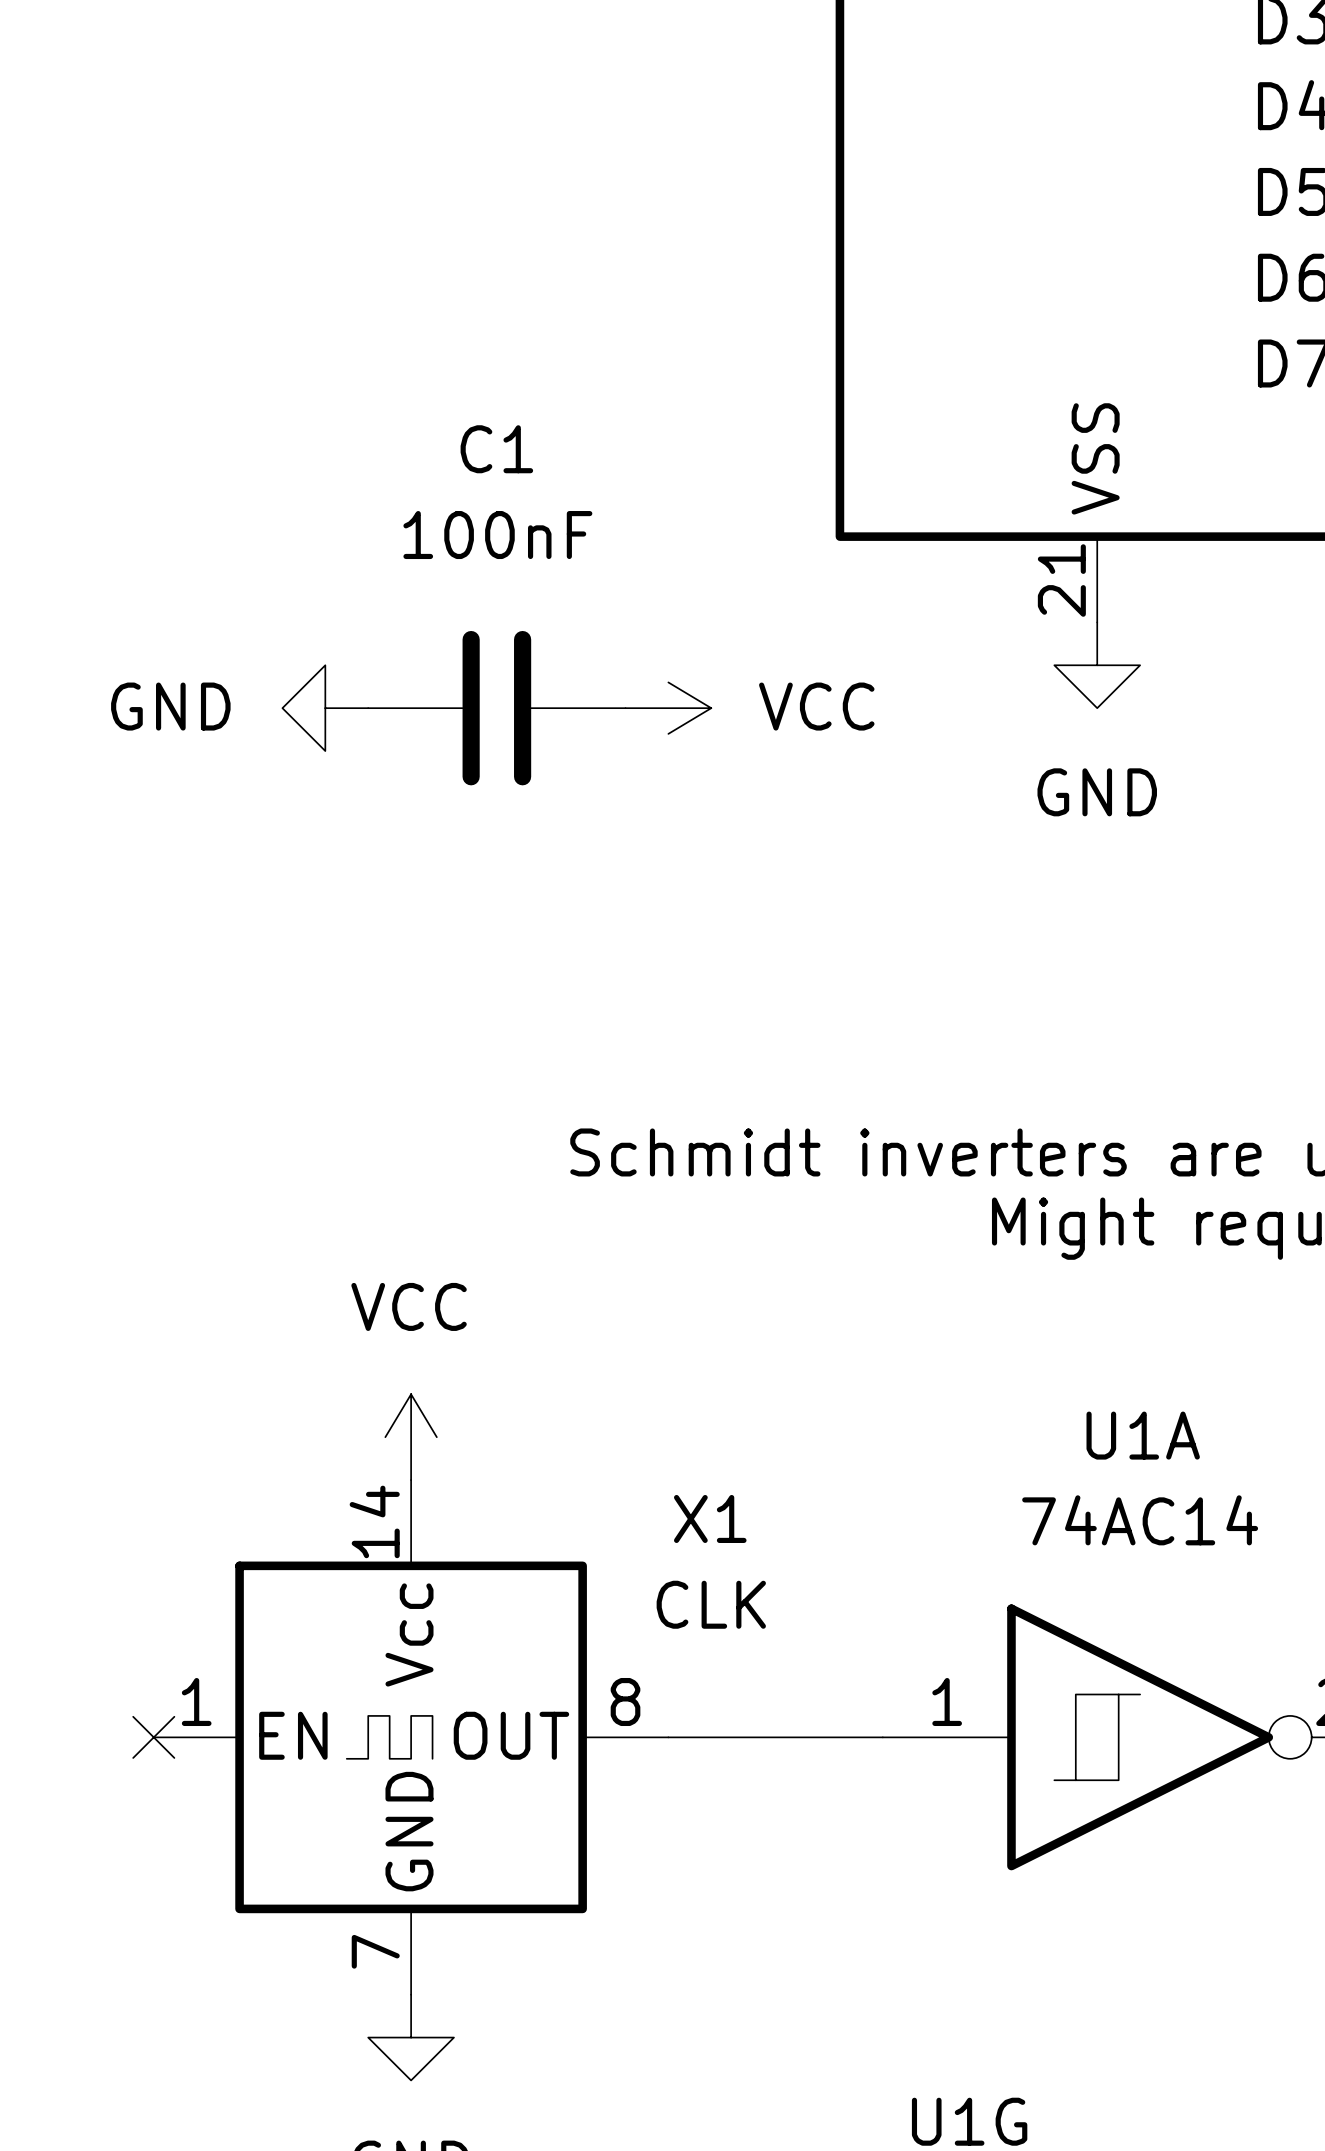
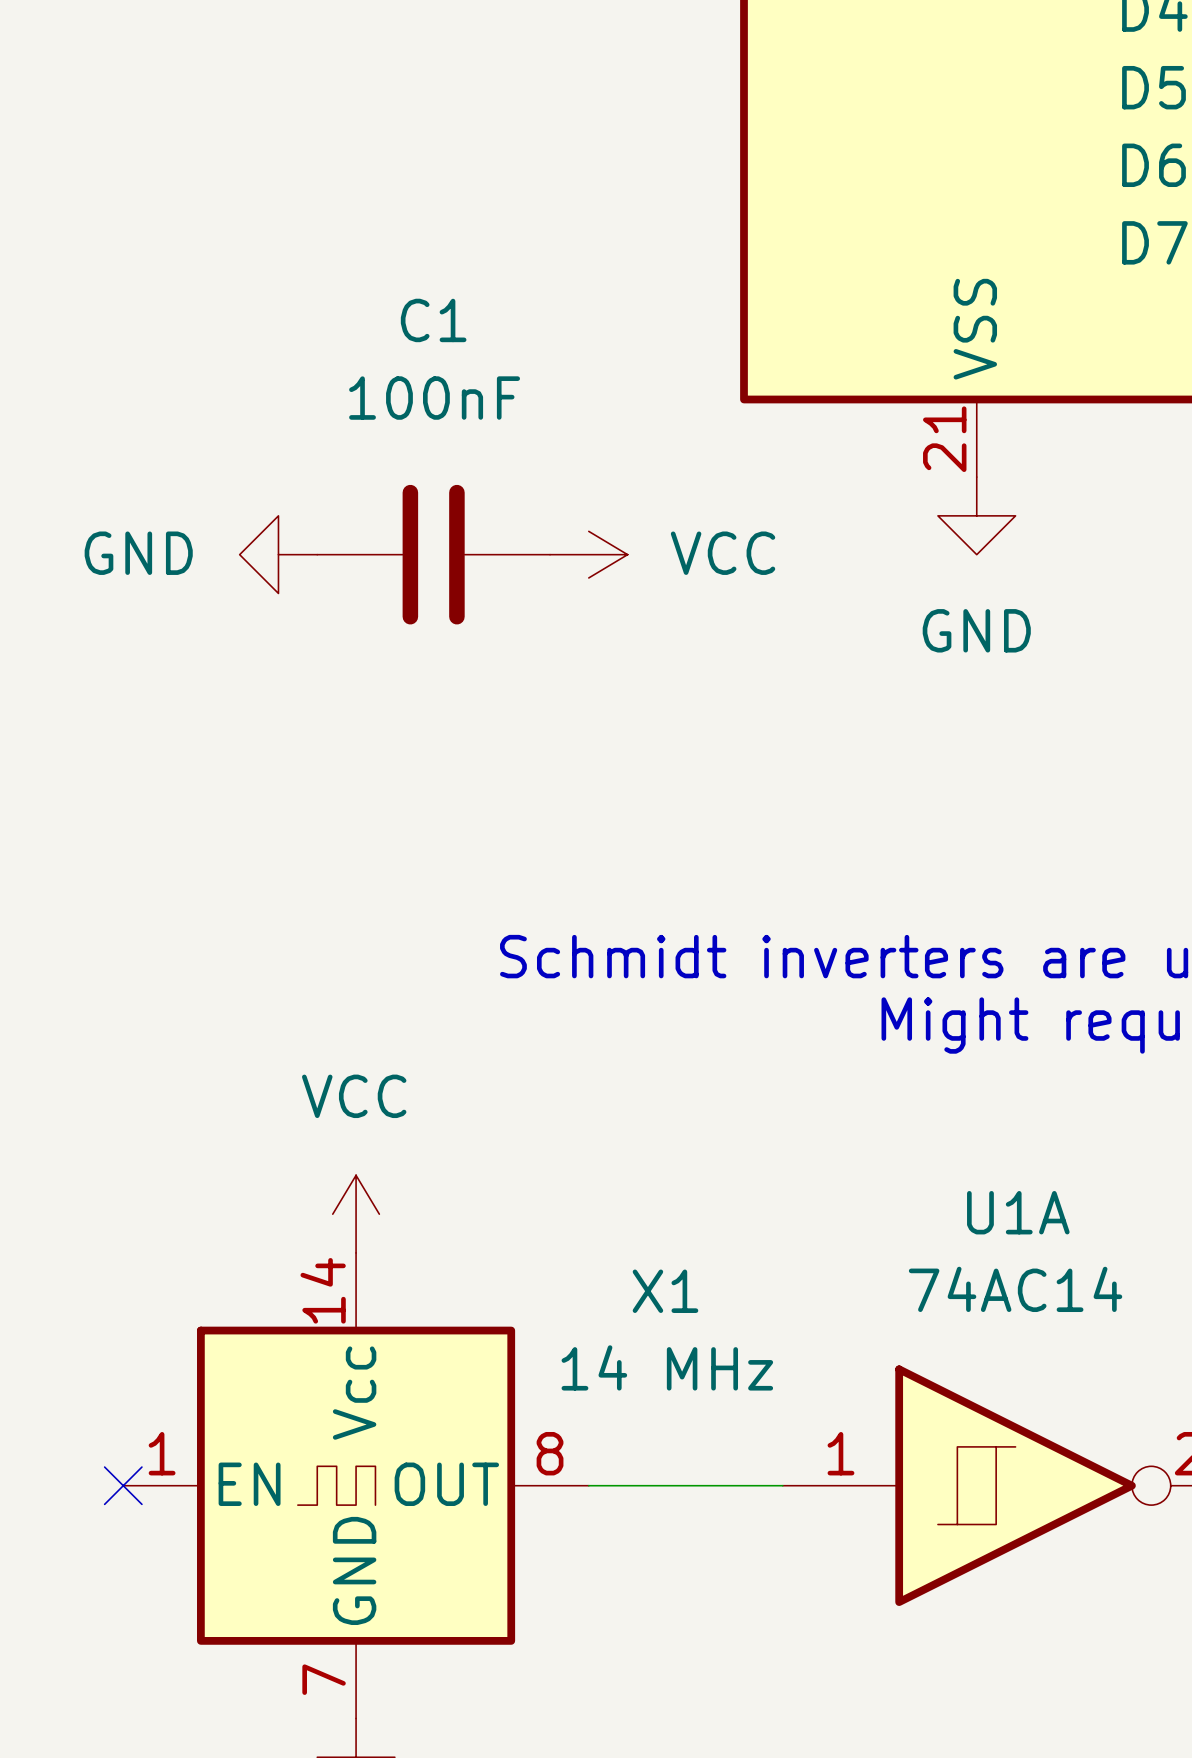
X1 name position: X1 (710, 1518) -> X1 (665, 1291)
X1 value: CLK (711, 1604) -> 14 MHz (667, 1367)

